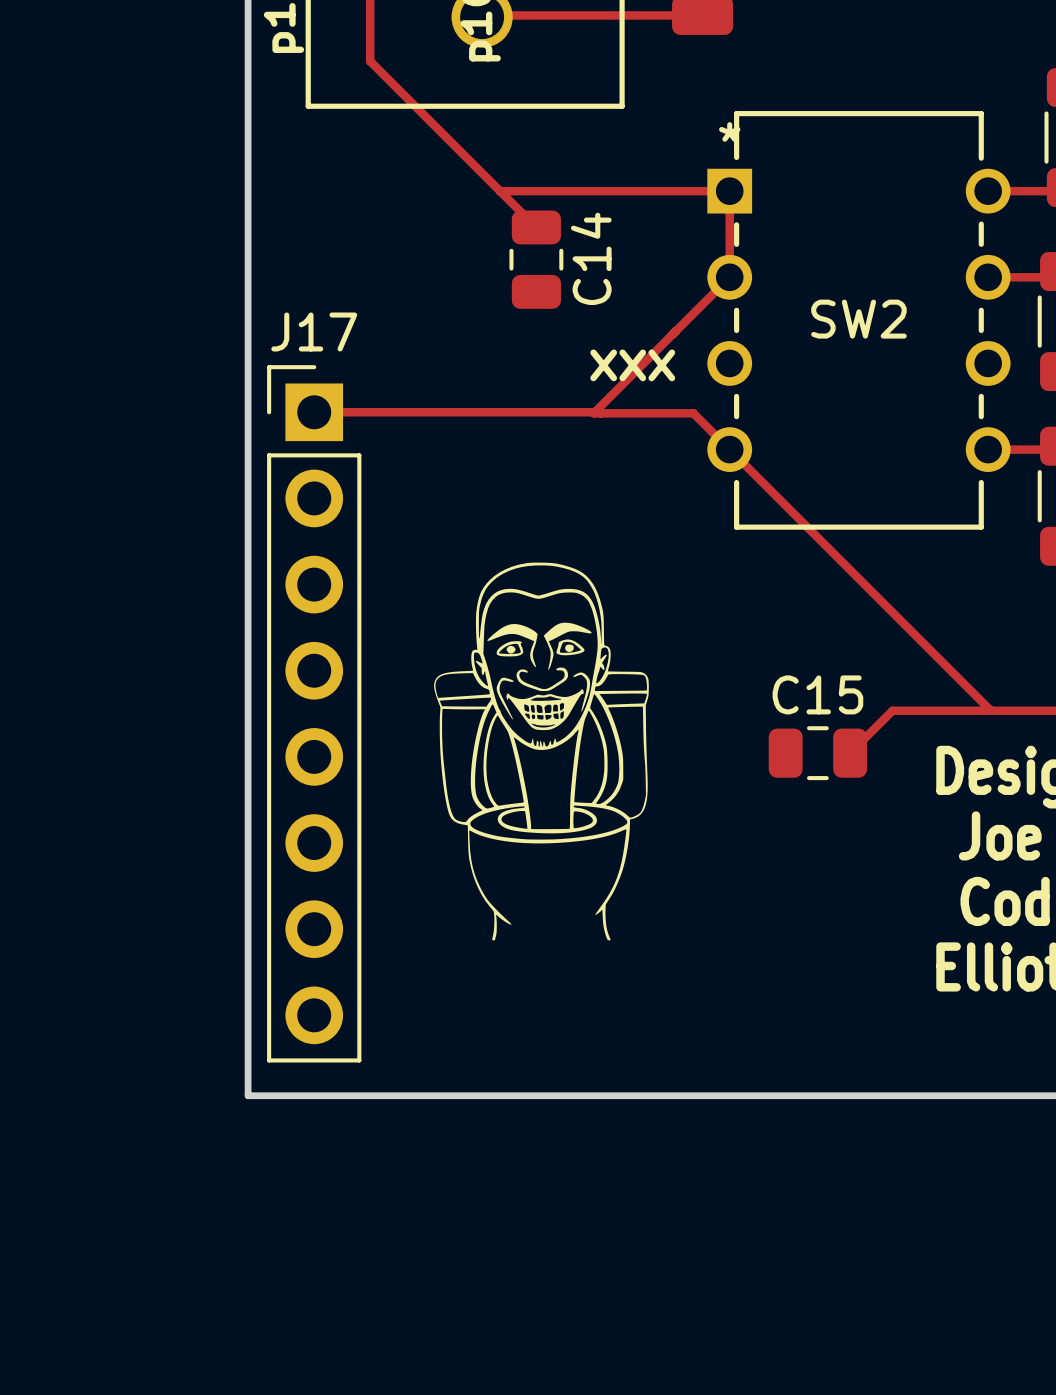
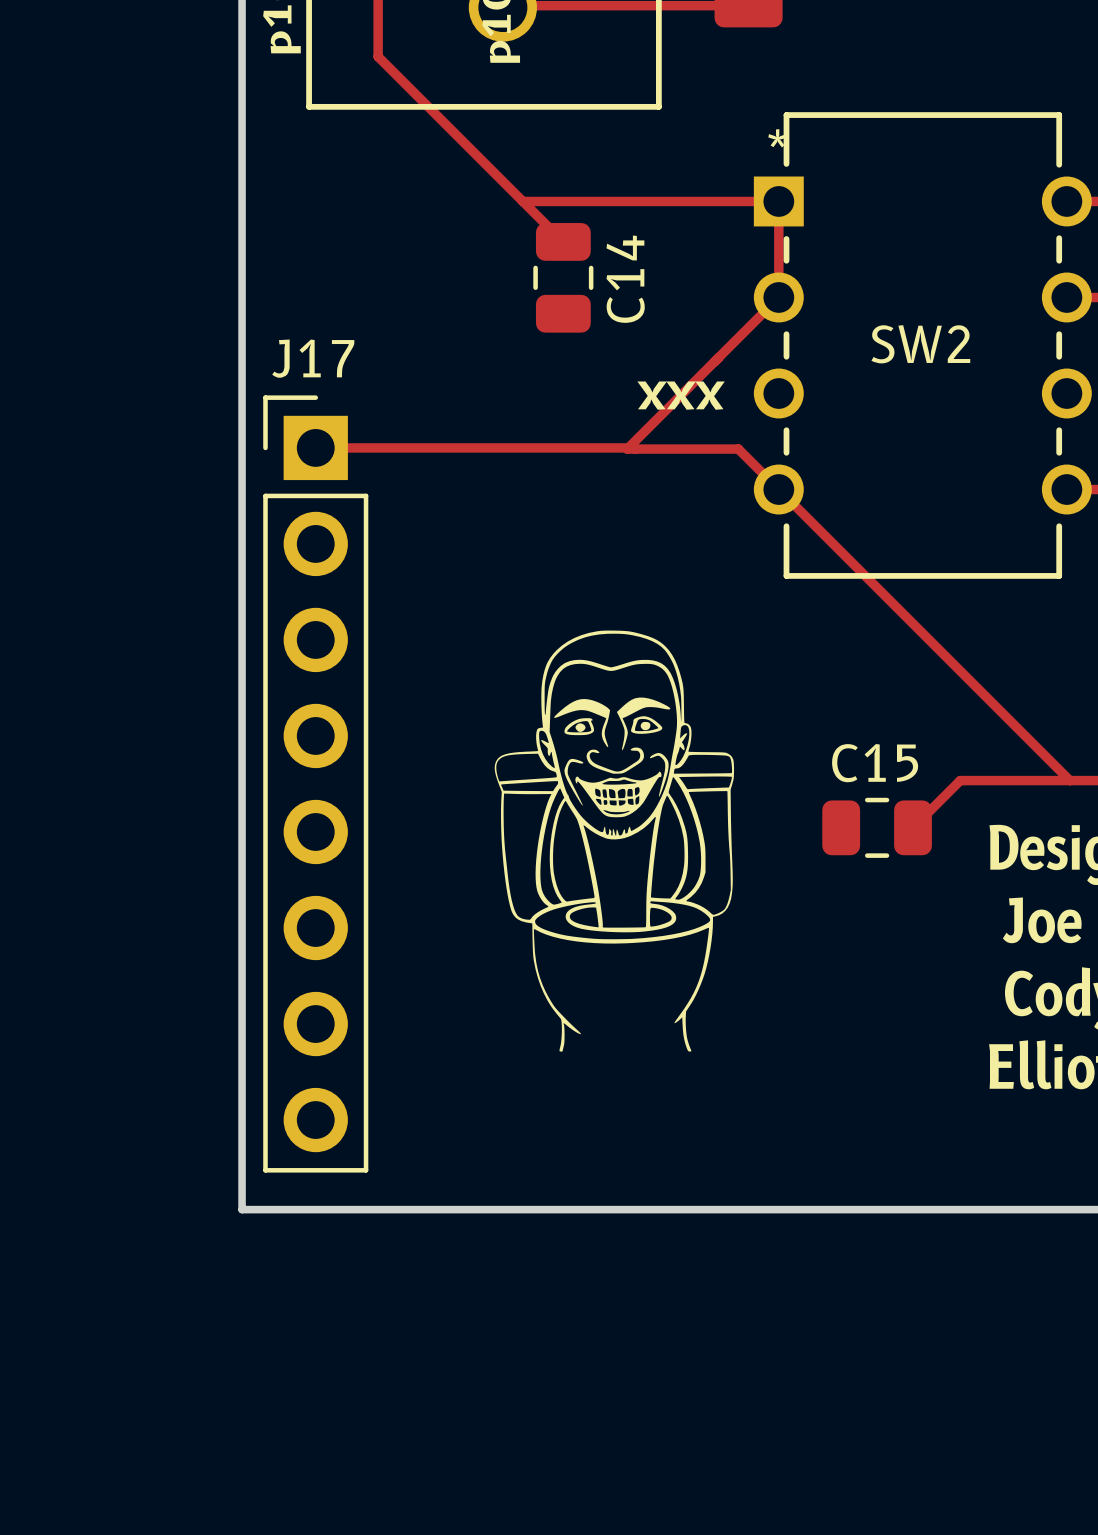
drawing position: (541, 751) -> (614, 841)

